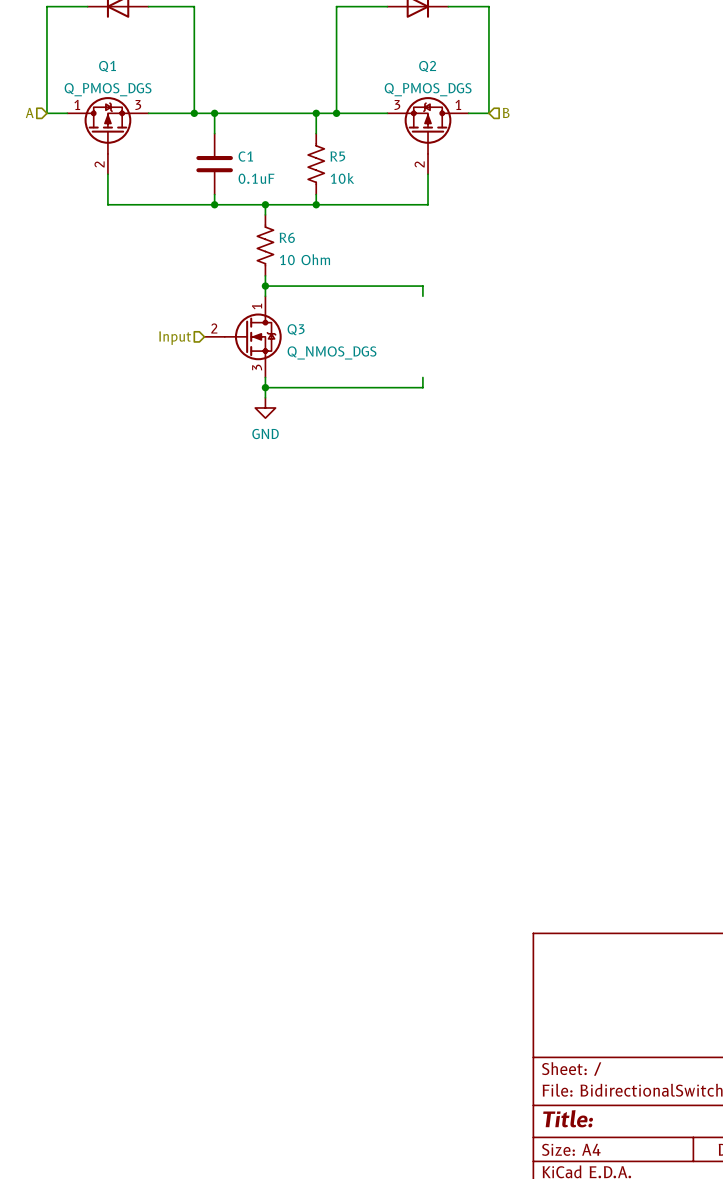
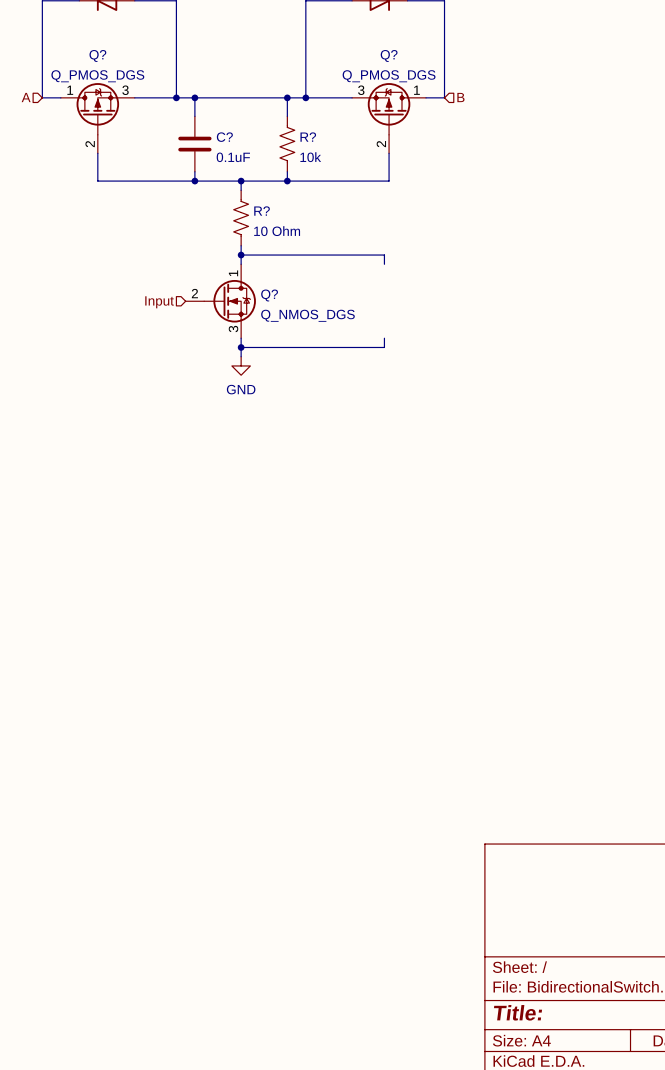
Q1 name: Q1 (107, 66) -> Q? (97, 55)
Q2 name: Q2 (427, 66) -> Q? (389, 55)
C1 name: C1 (245, 156) -> C? (224, 137)
R5 name: R5 (337, 156) -> R? (308, 137)
R6 name: R6 (287, 237) -> R? (262, 211)
Q3 name: Q3 (296, 329) -> Q? (269, 295)

